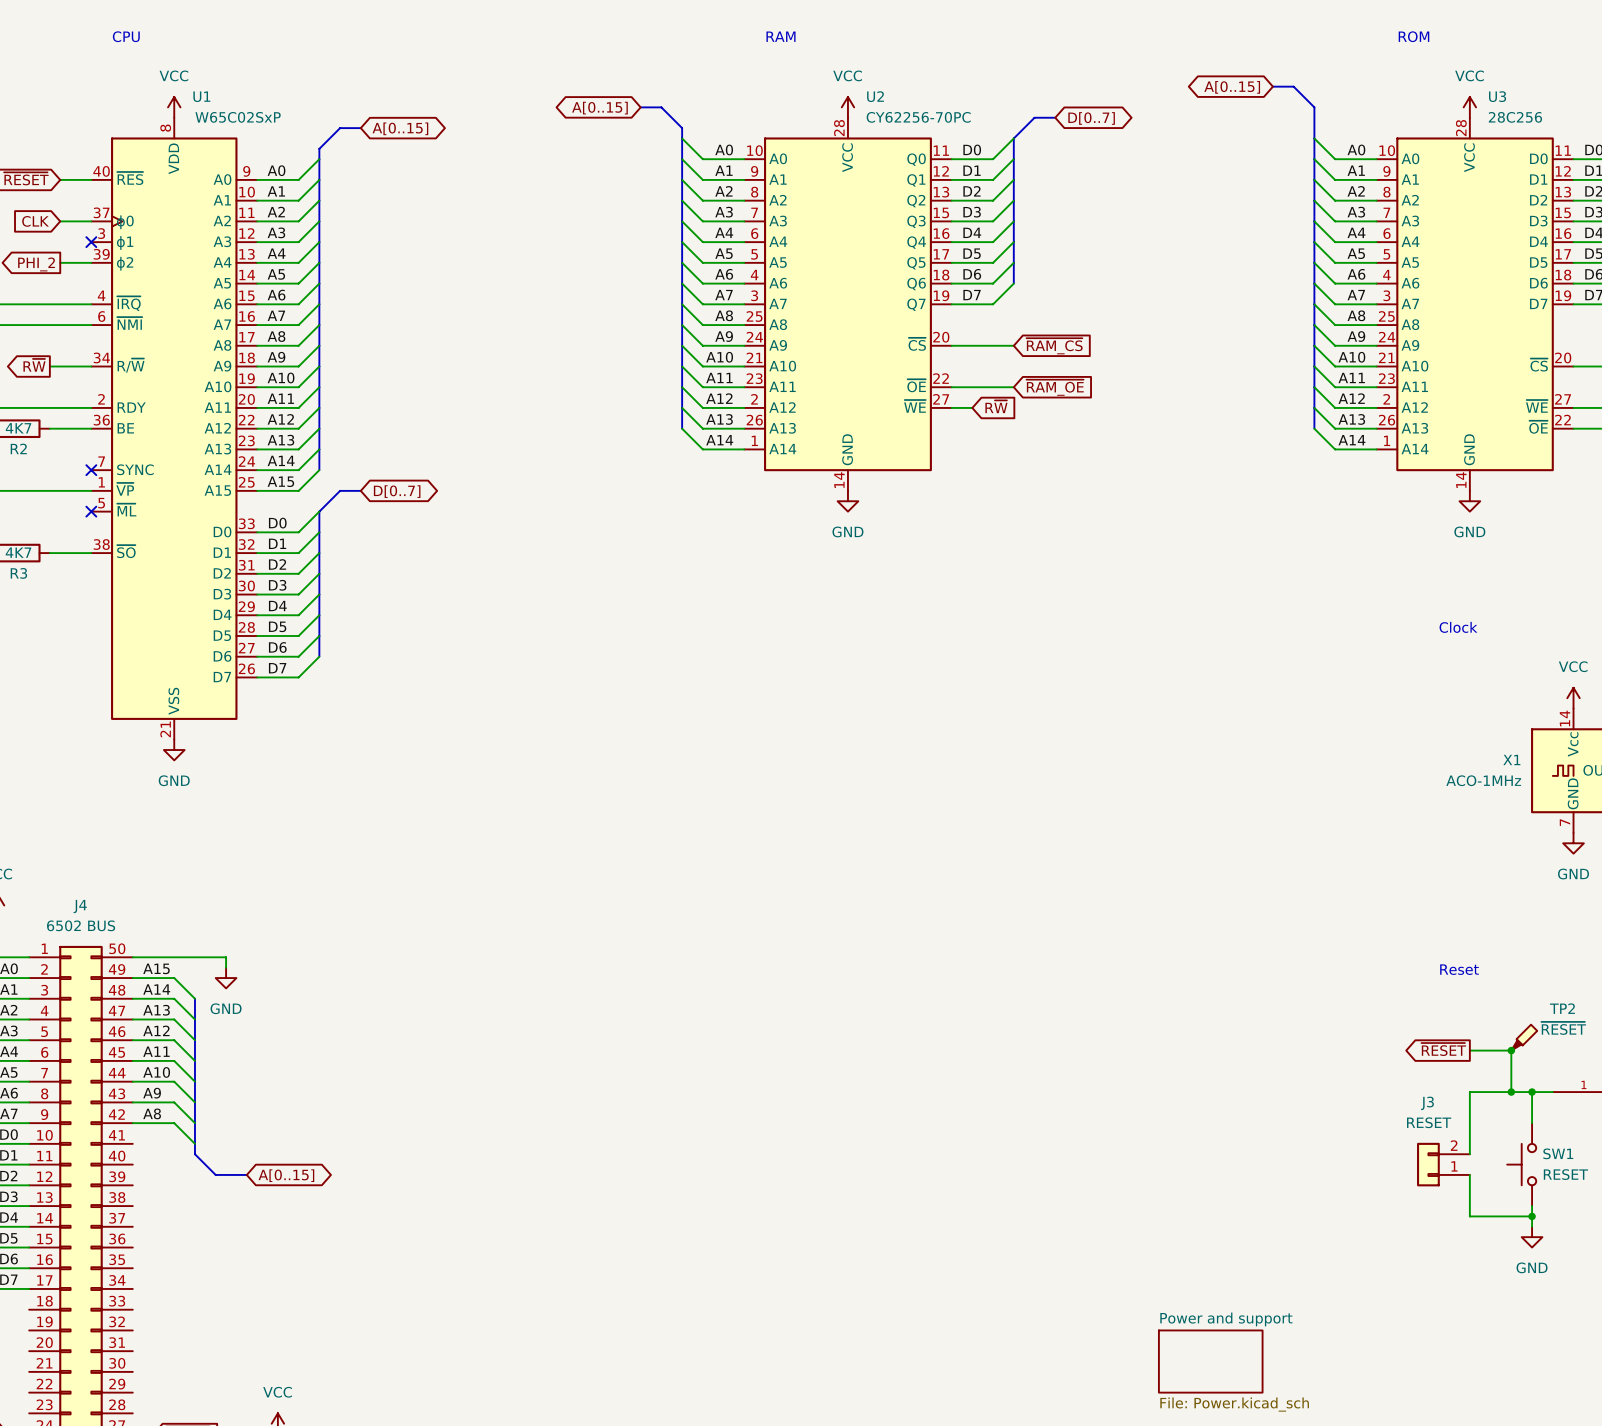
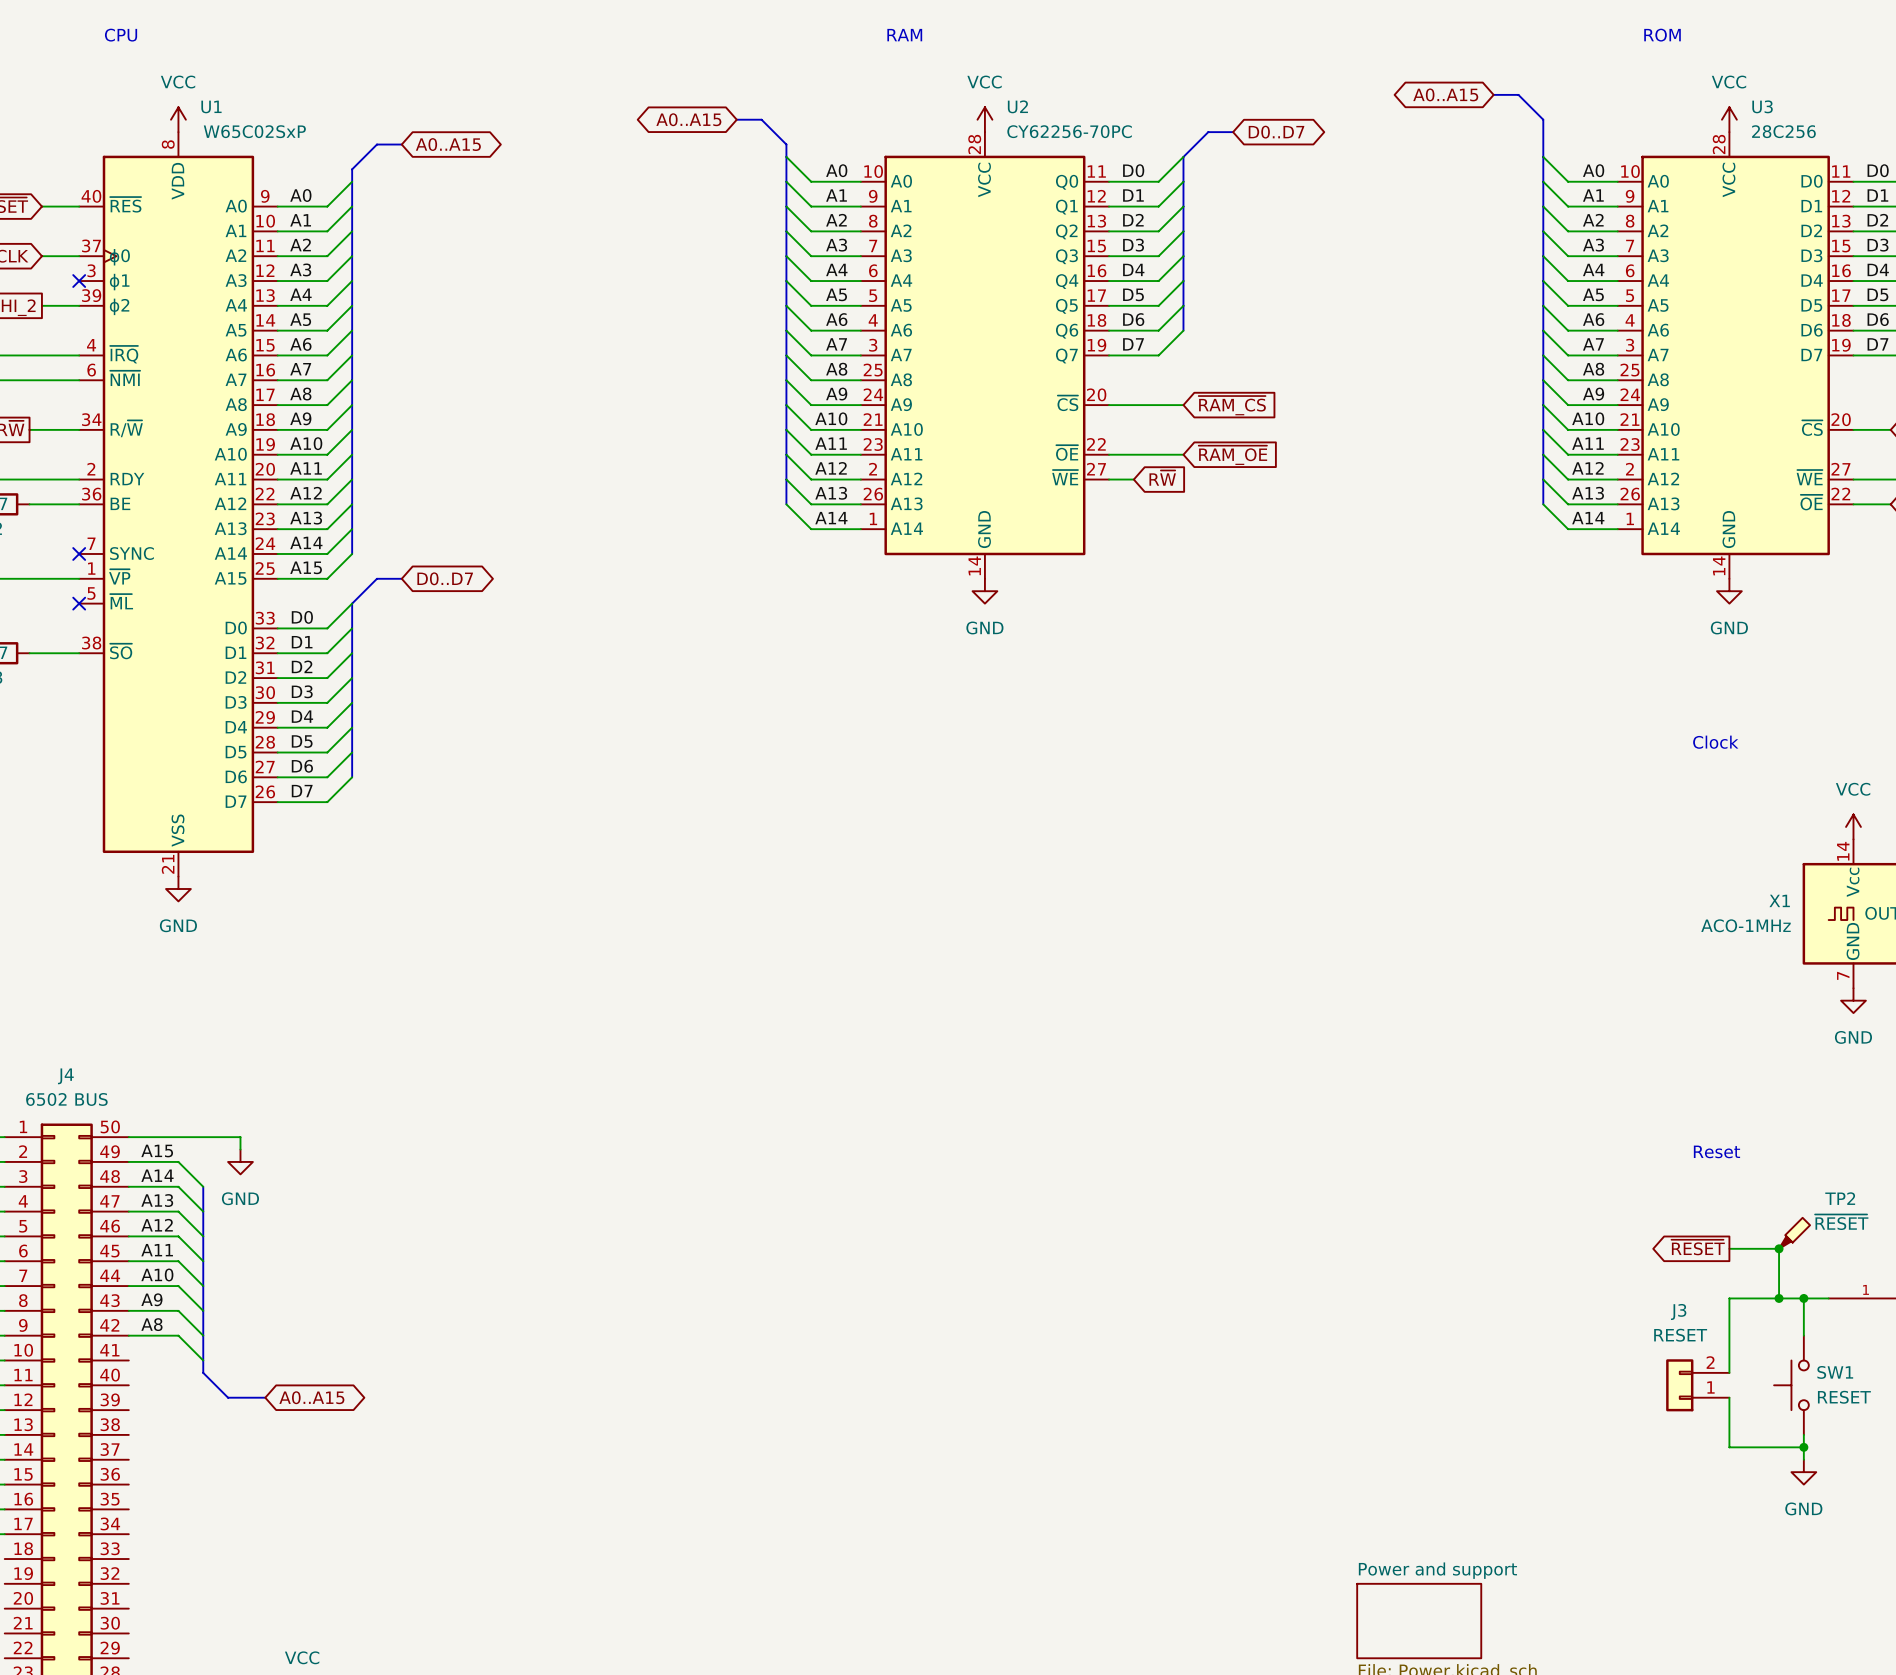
global label: A[0..15] (1232, 87) -> A0..A15 (1445, 94)
global label: A[0..15] (599, 108) -> A0..A15 (688, 119)
global label: D[0..7] (1091, 118) -> D0..D7 (1276, 132)
global label: A[0..15] (400, 128) -> A0..A15 (448, 144)
global label: D[0..7] (397, 491) -> D0..D7 (445, 578)
global label: A[0..15] (286, 1175) -> A0..A15 (311, 1397)

